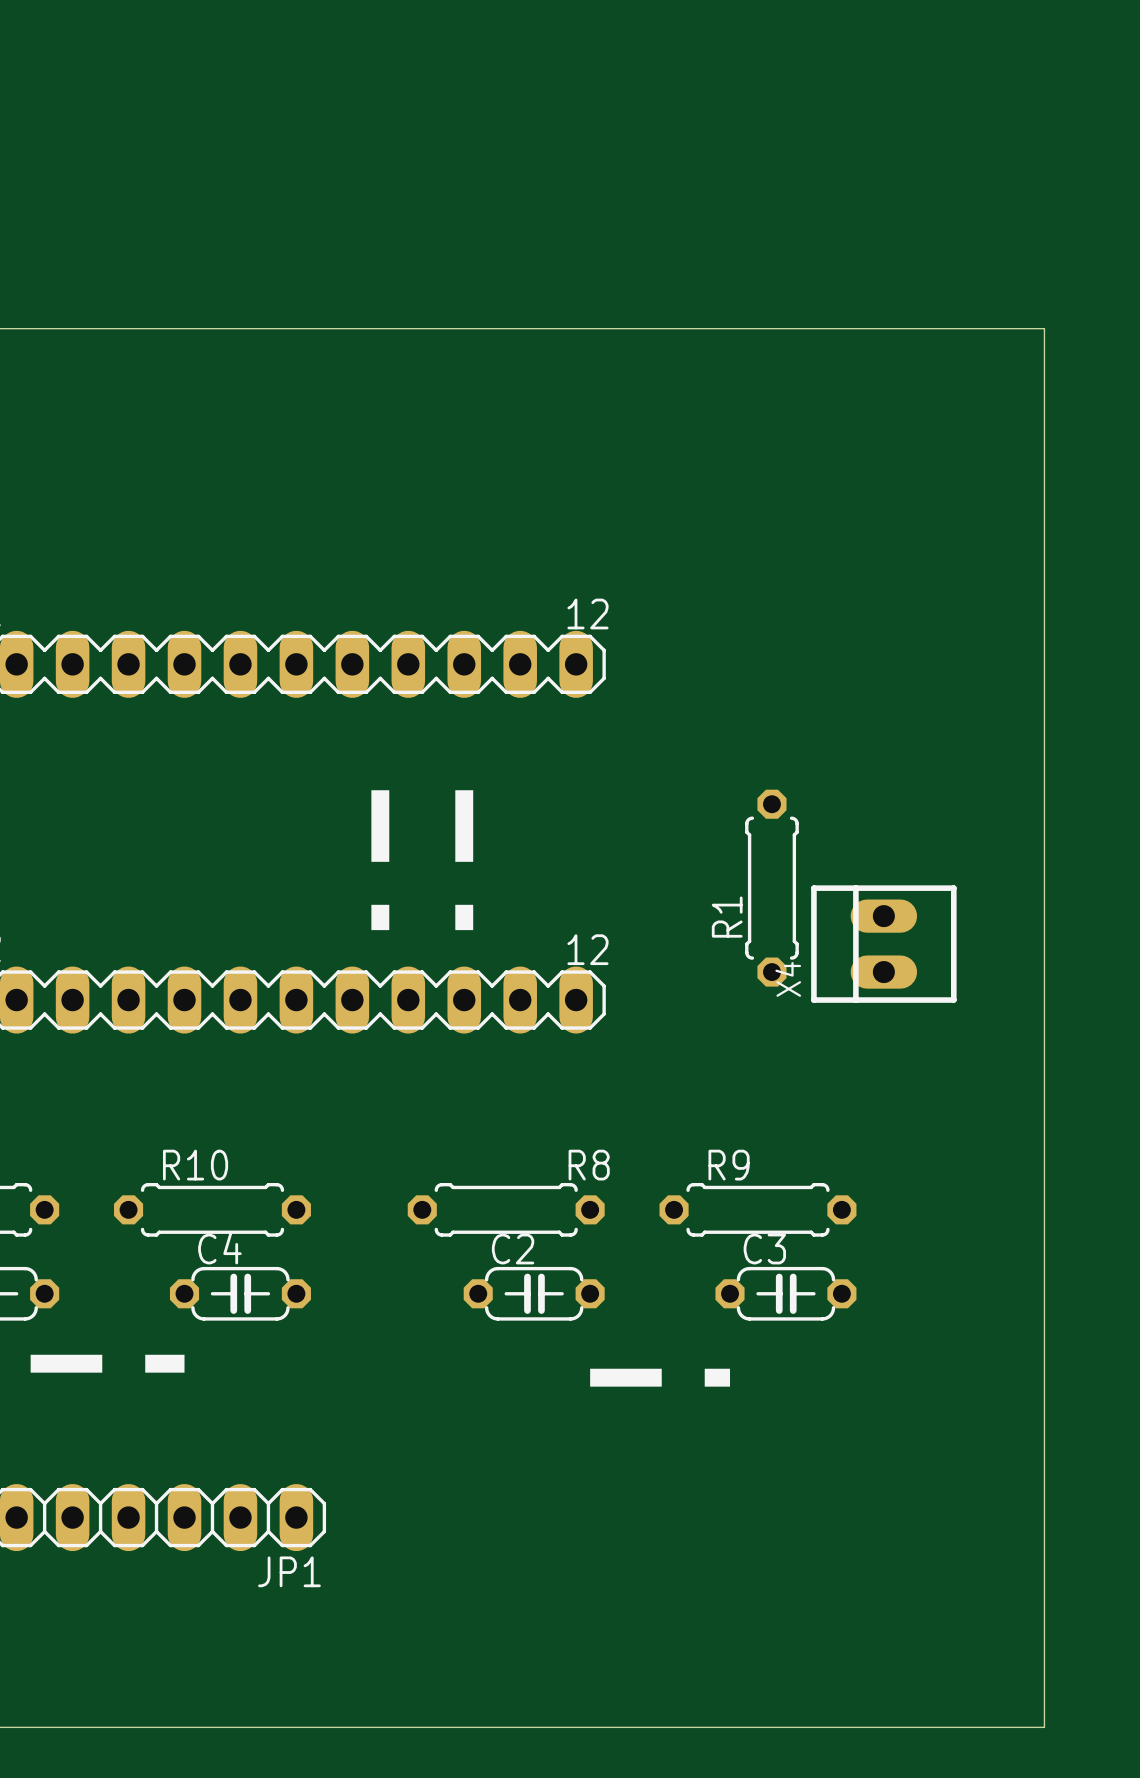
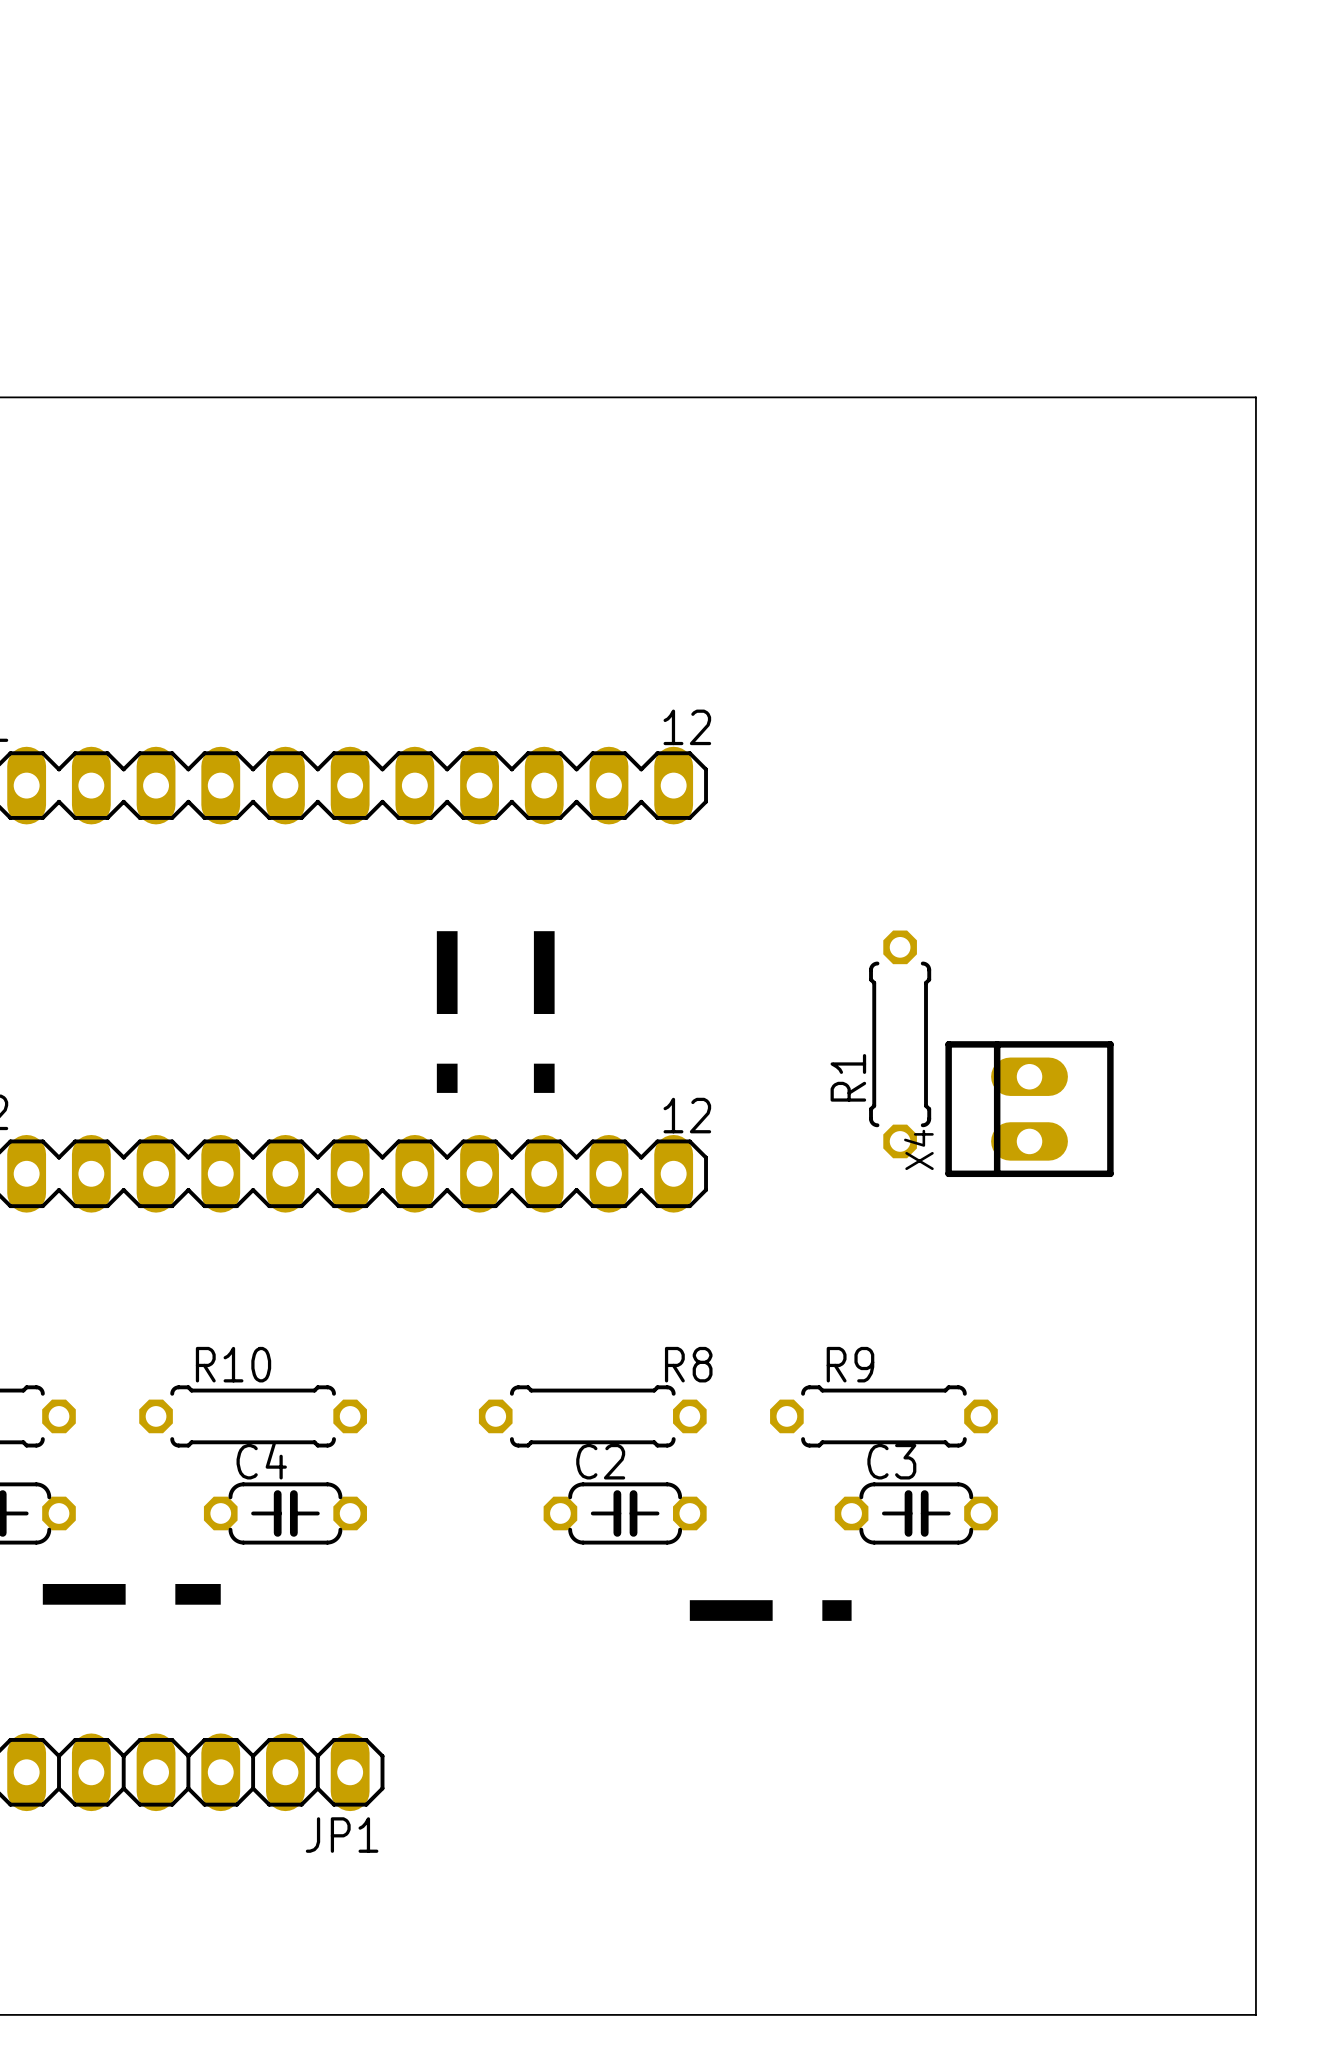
board edge: (1044, 328) (1044, 1727) -> (1215, 397) (1255, 397) (1255, 2014) (1215, 2014)

